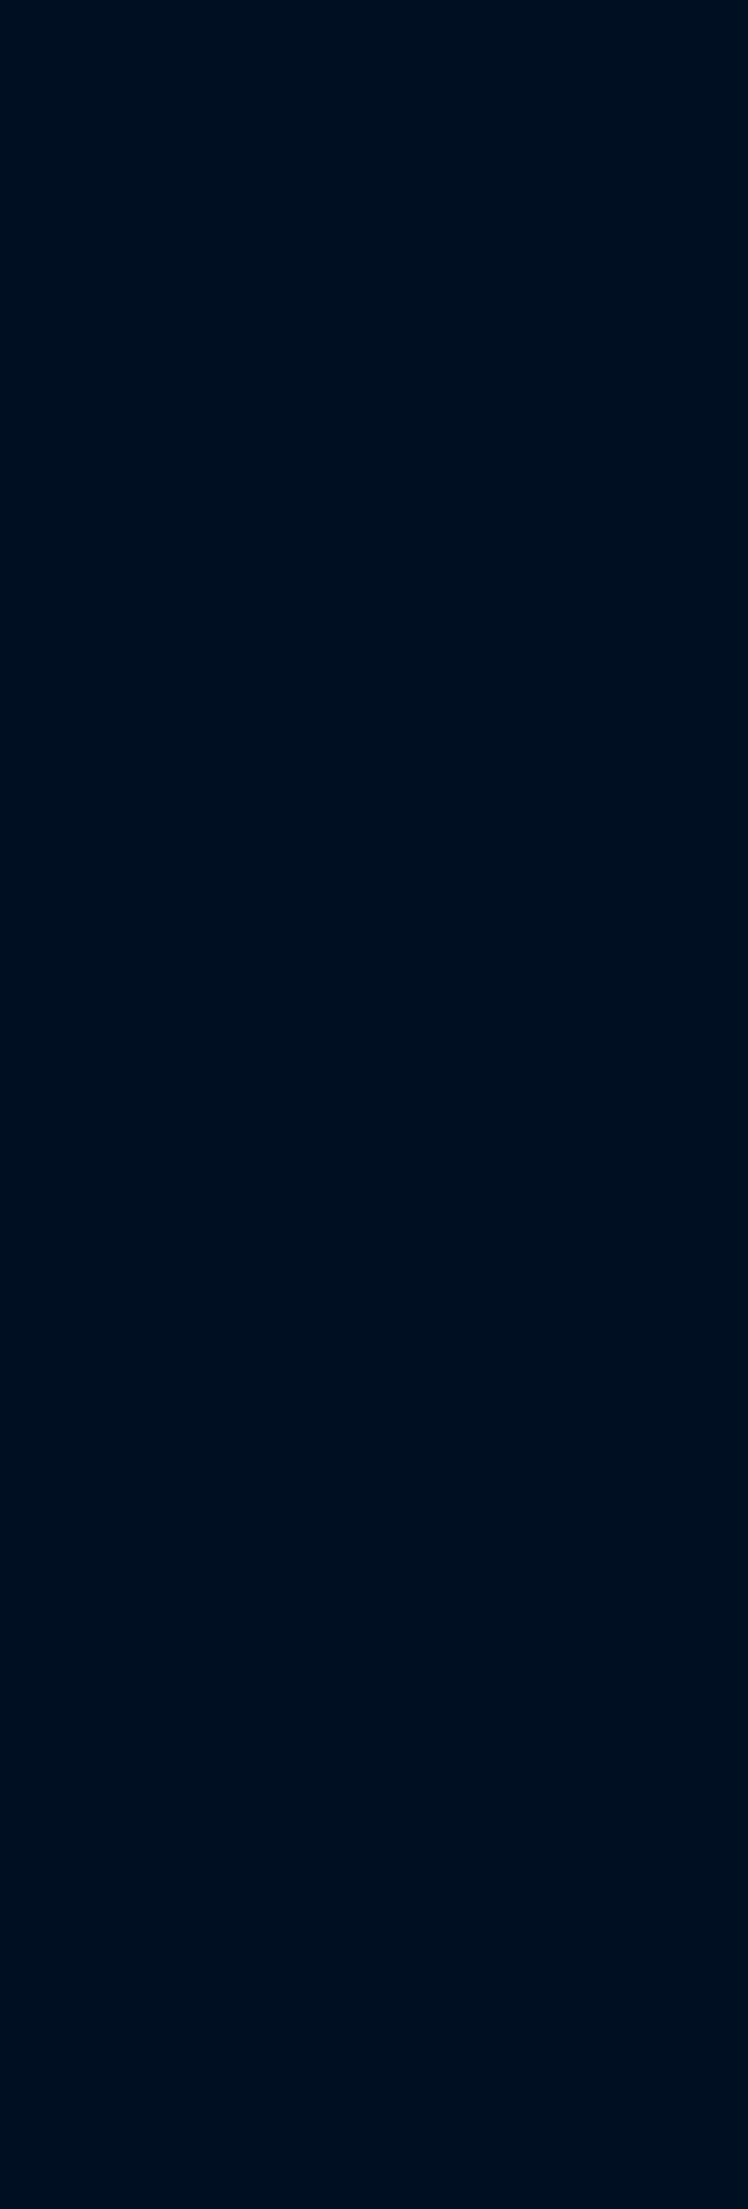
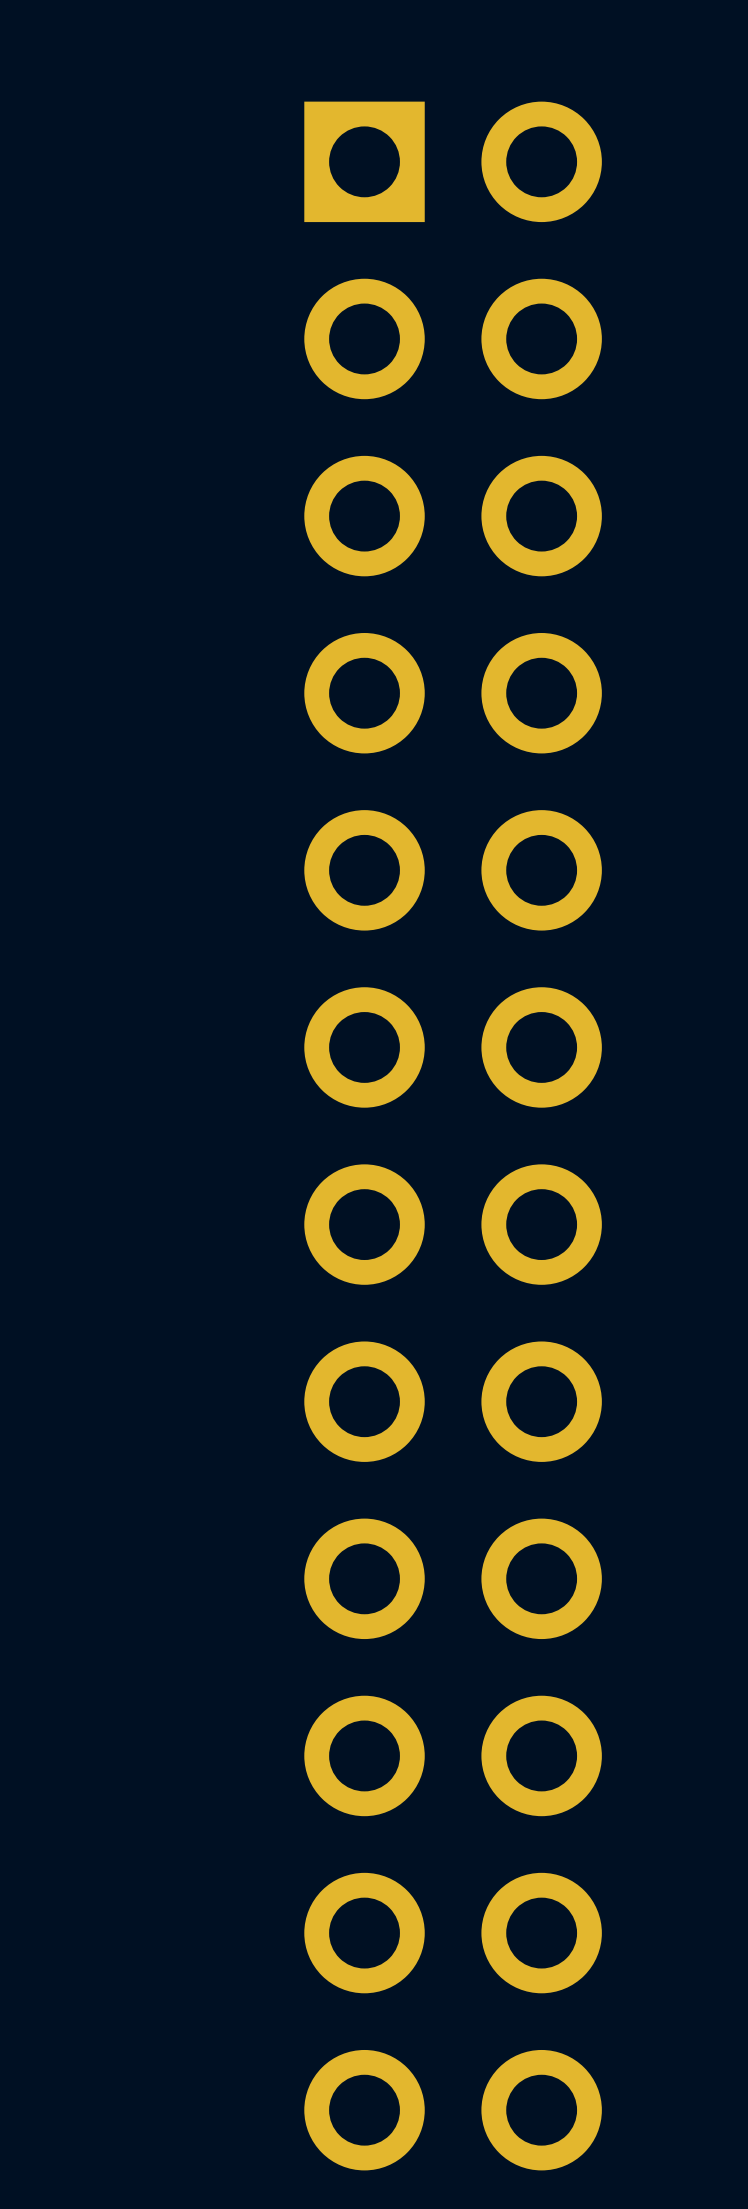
part: none -> (453, 1136)

